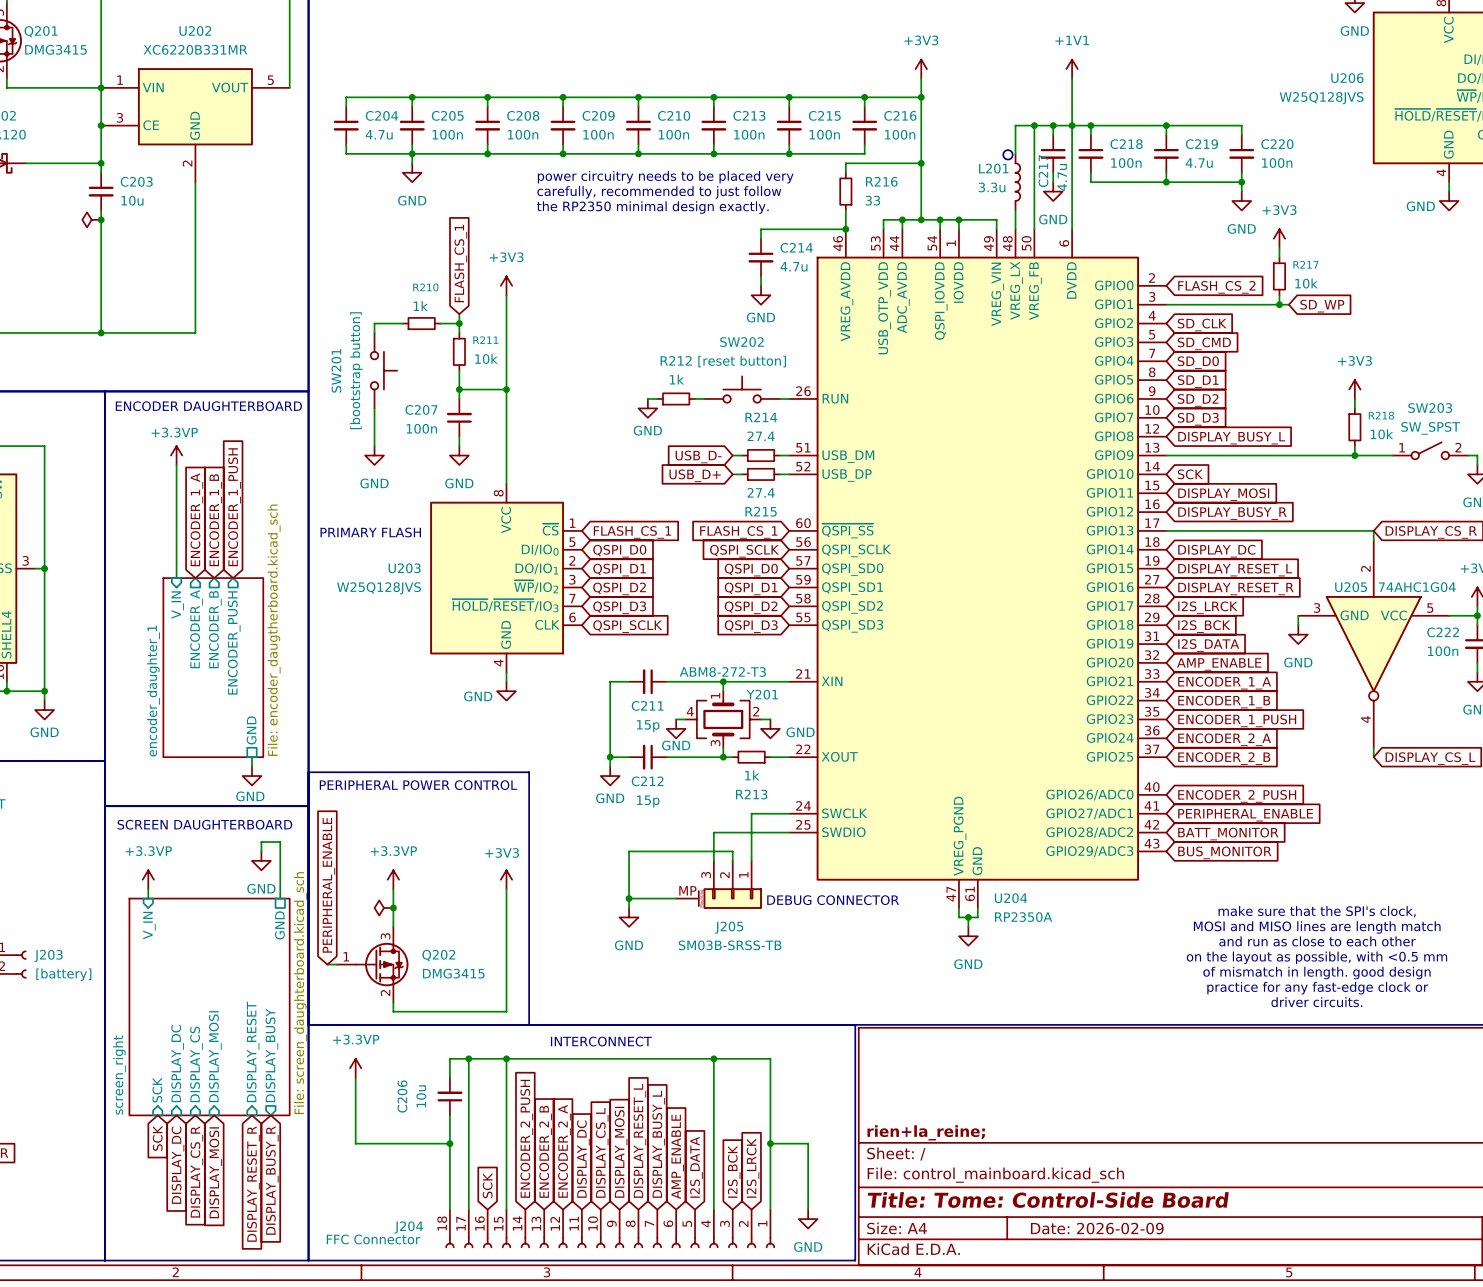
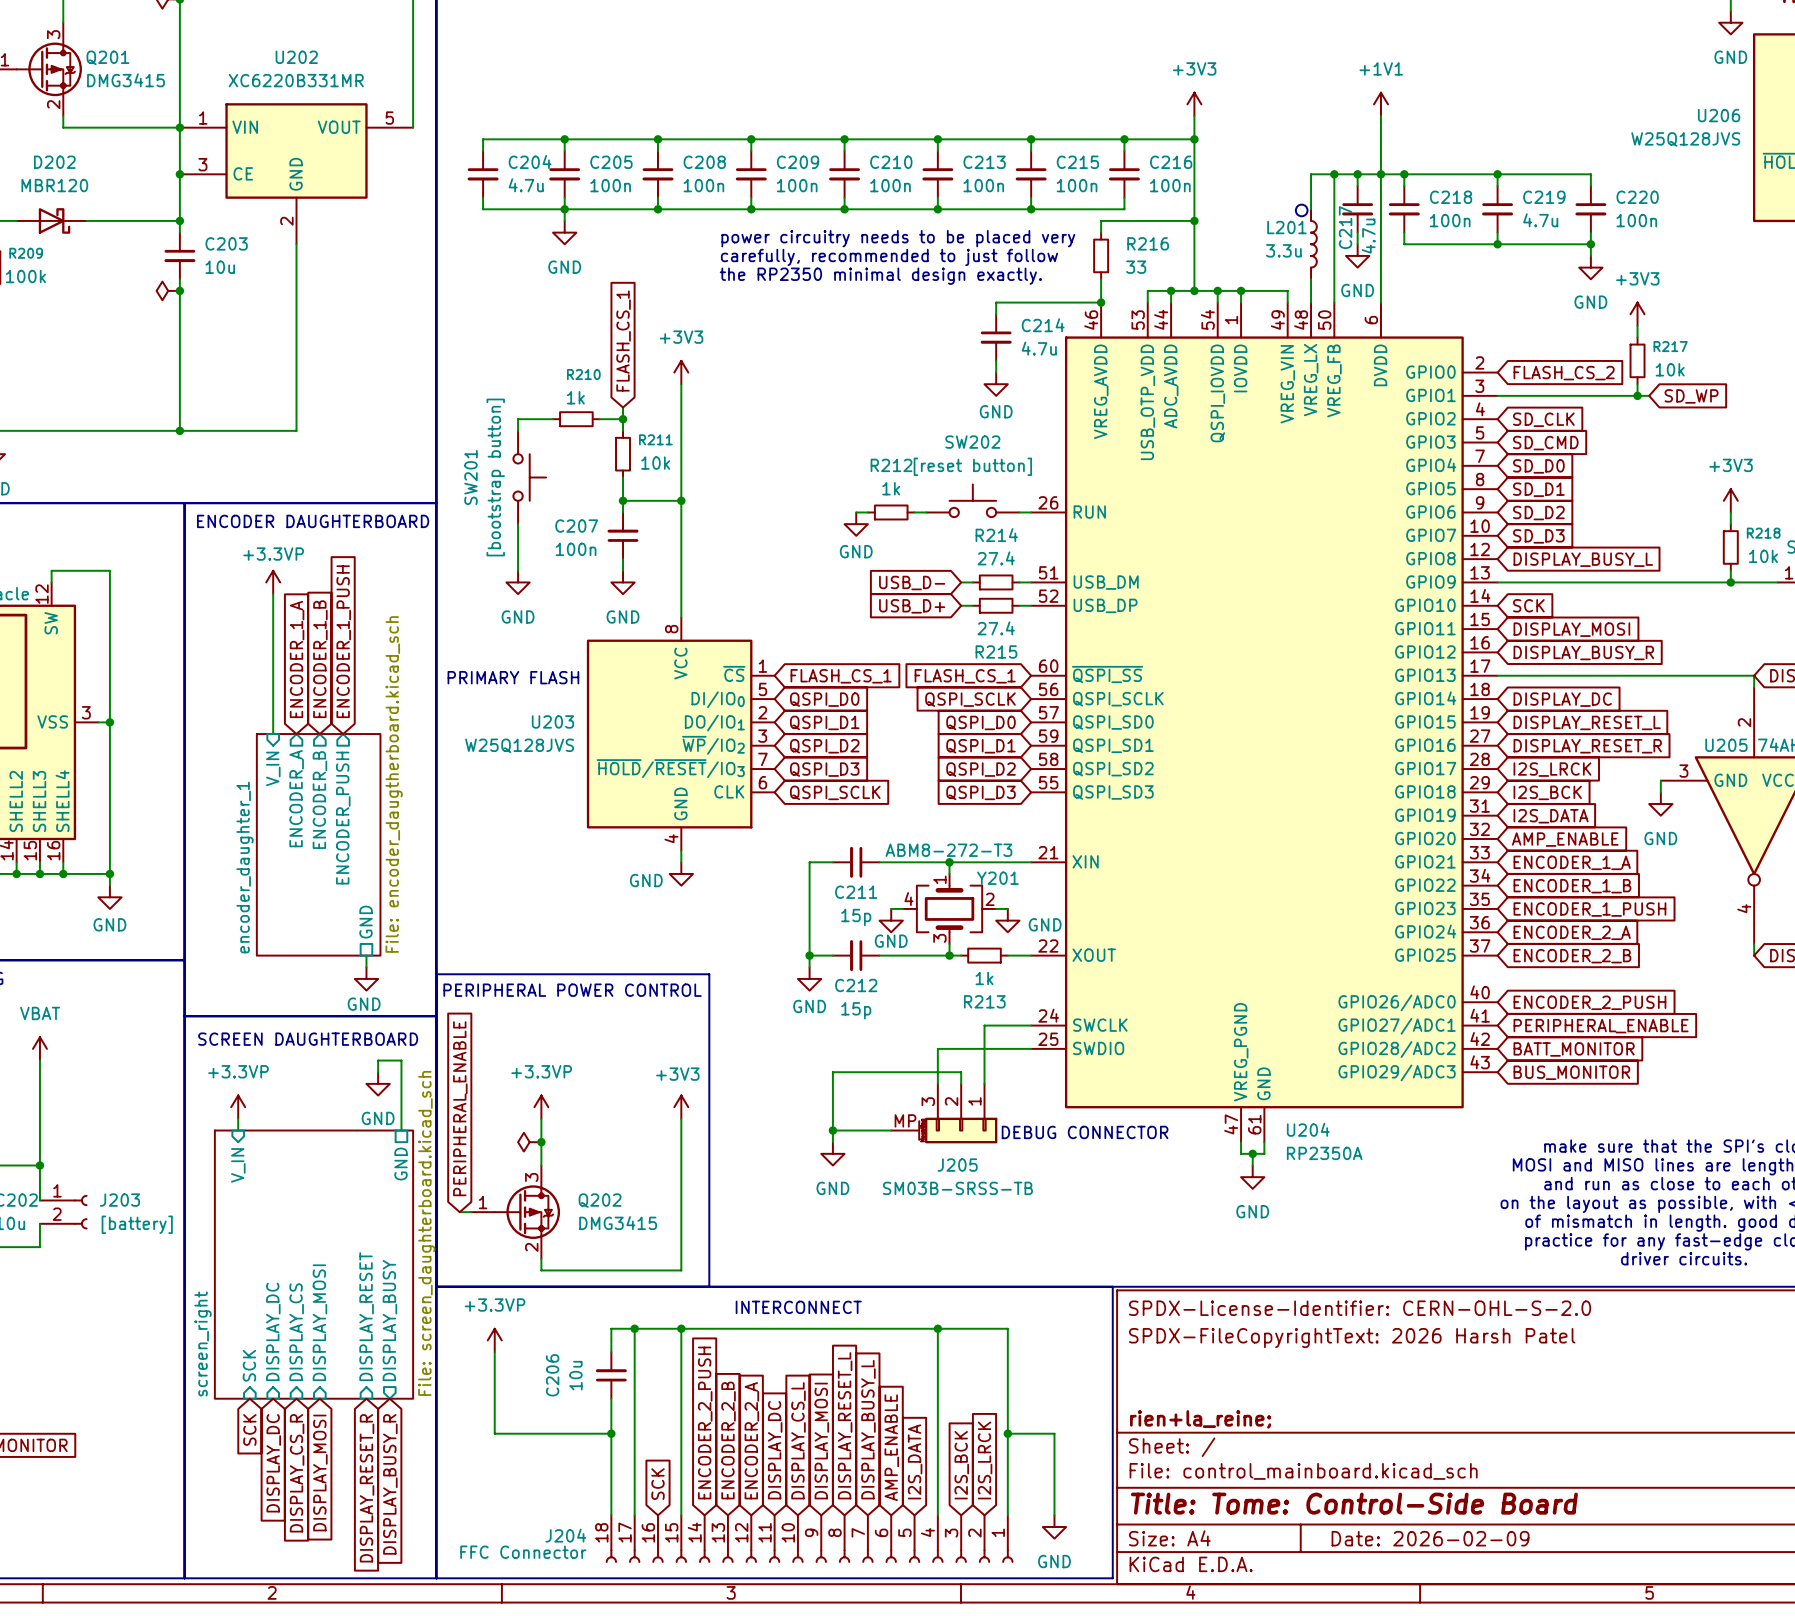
title block: none -> SPDX-License-Identifier: CERN-OHL-S-2.0 (1360, 1308)
title block: none -> SPDX-FileCopyrightText: 2026 Harsh Patel (1352, 1338)

